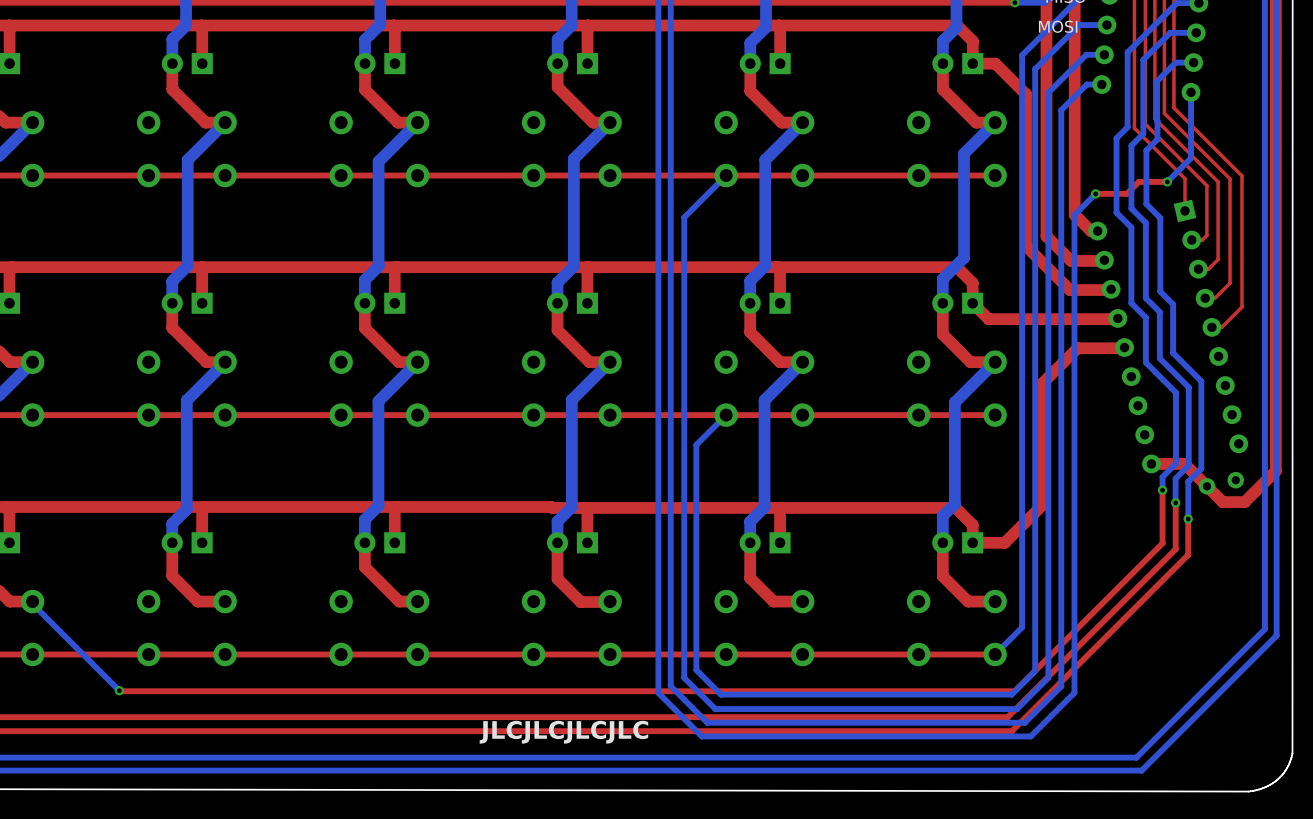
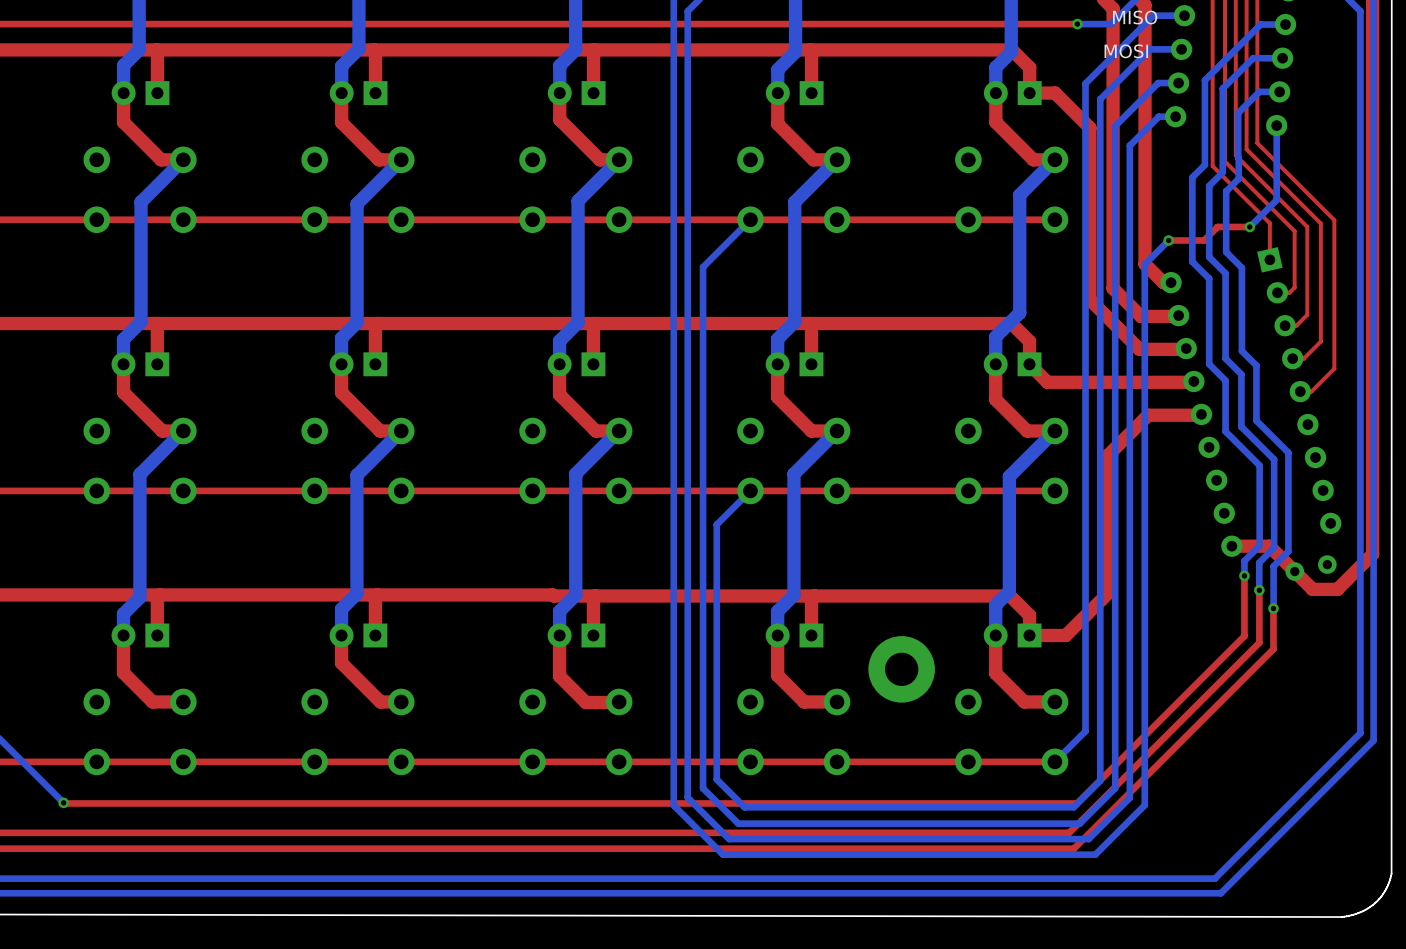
part: none -> (901, 669)
text: JLCJLCJLCJLC (563, 732) -> none

